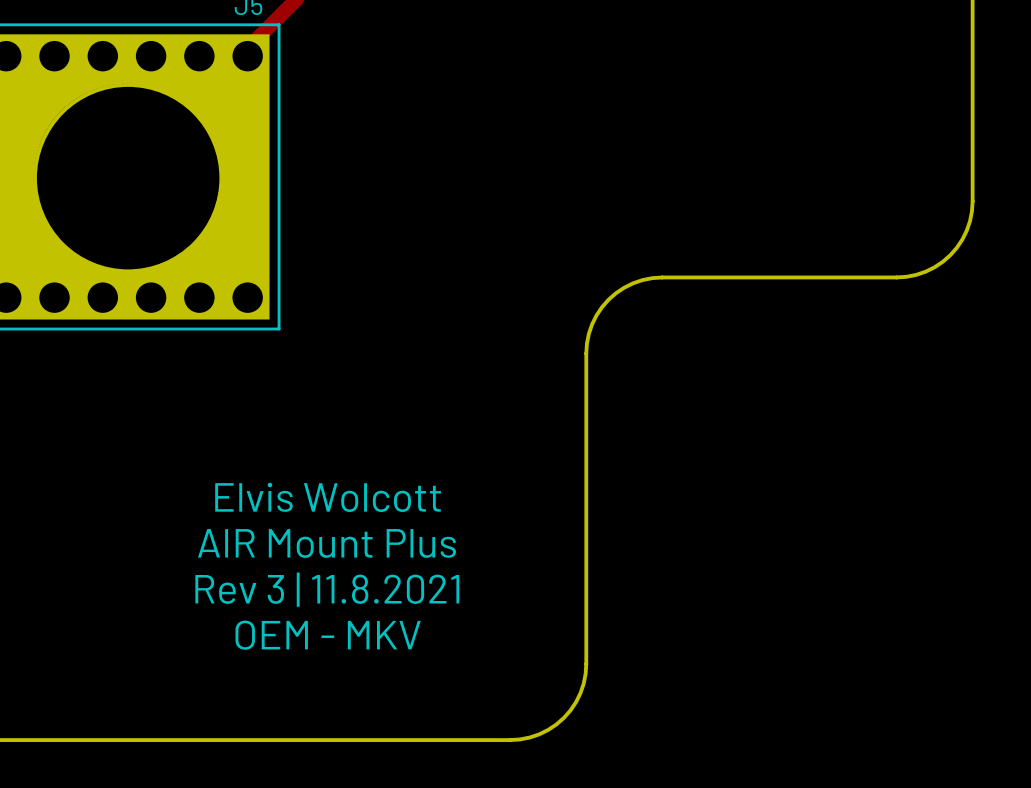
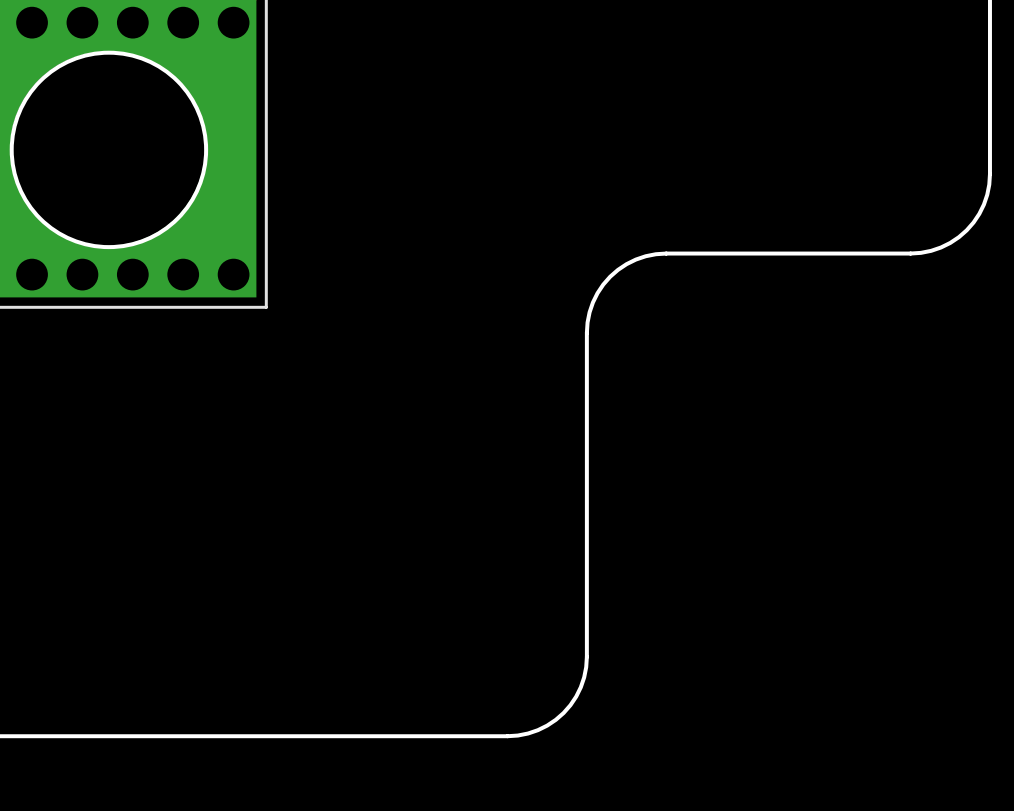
text: Elvis Wolcott (328, 497) -> none
text: AIR Mount Plus (326, 543) -> none
text: Rev 3 | 11.8.2021 (327, 589) -> none
text: OEM - MKV (328, 635) -> none

